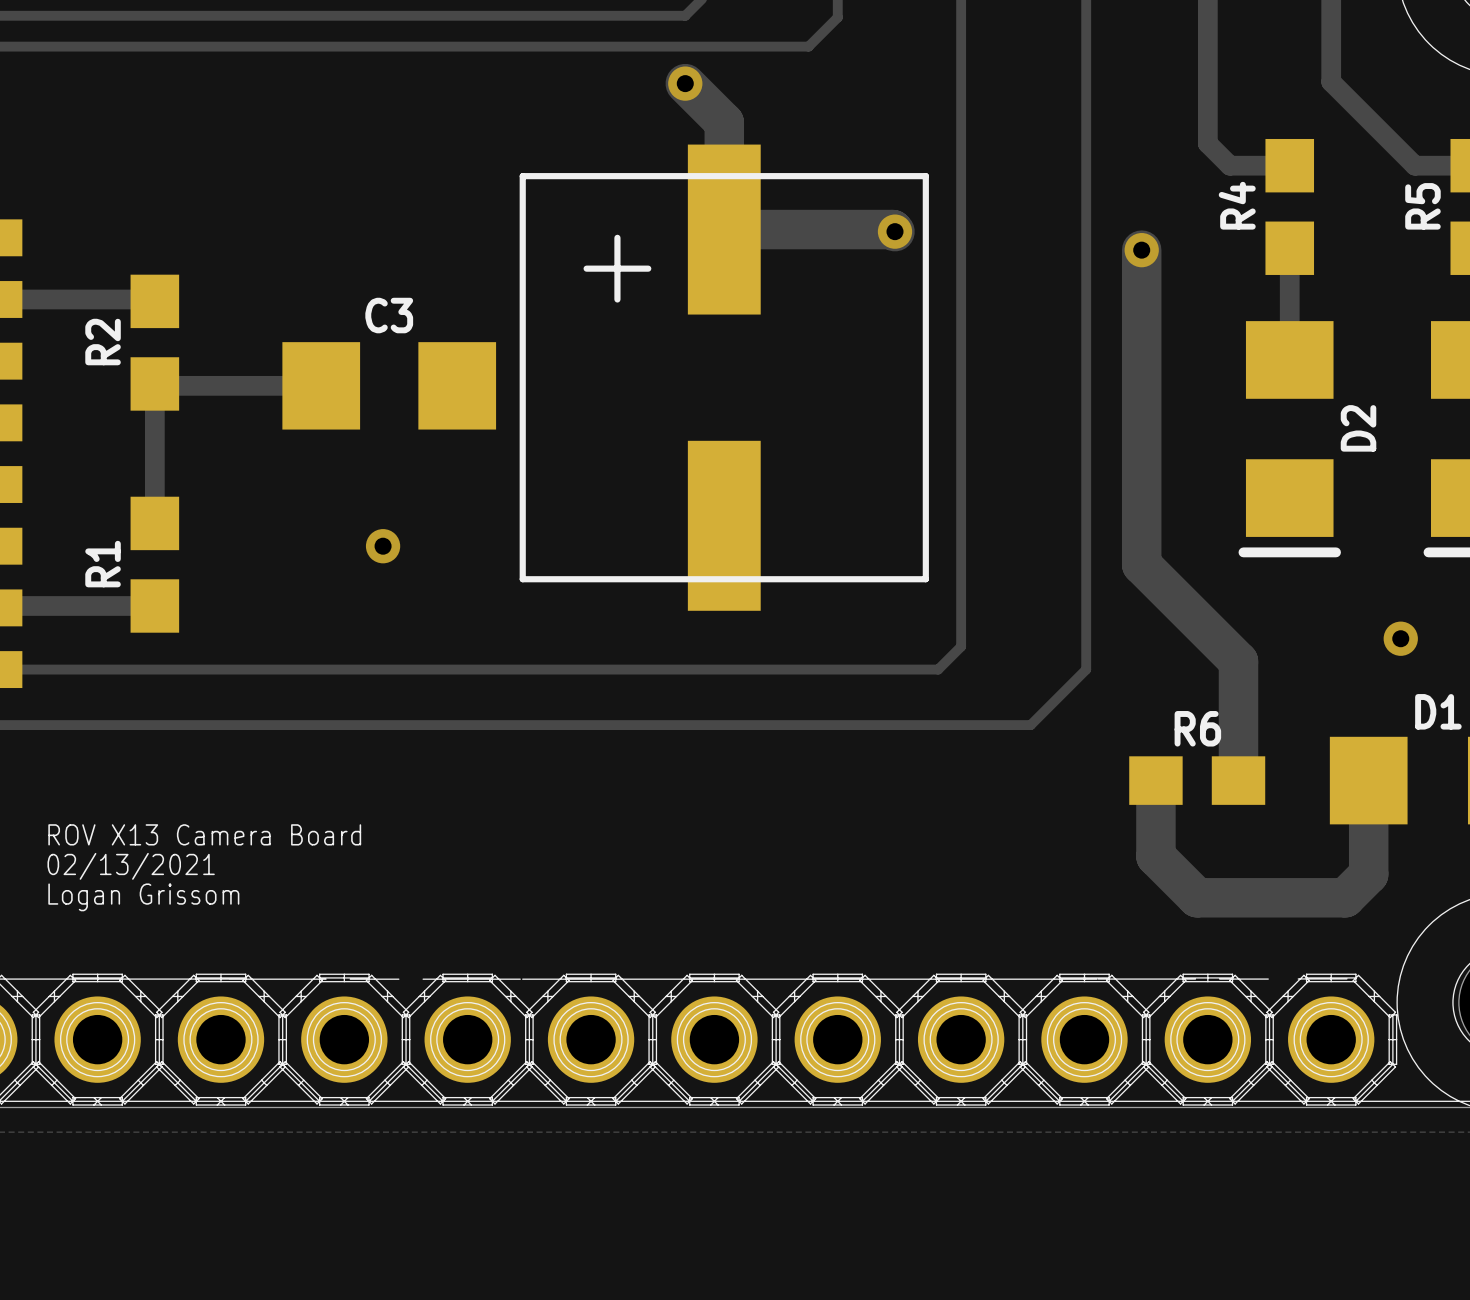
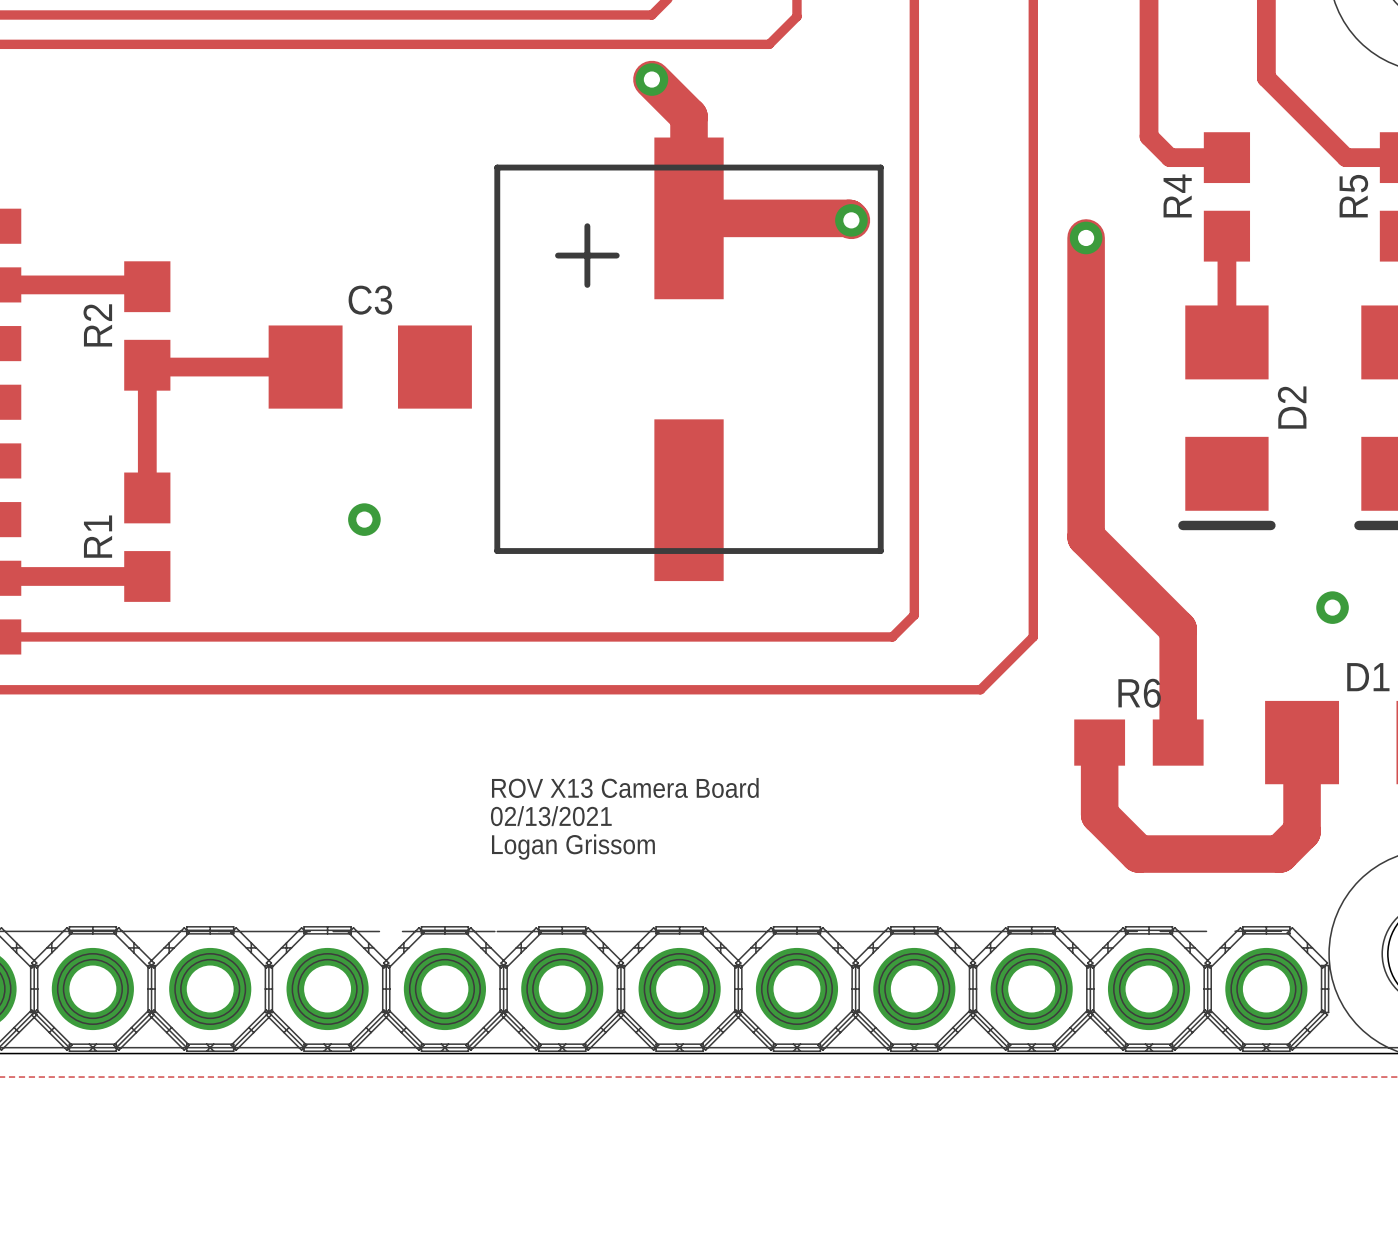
text position: ROV X13 Camera Board (204, 834) -> ROV X13 Camera Board (625, 787)
text position: 02/13/2021 (131, 866) -> 02/13/2021 (551, 816)
text position: Logan Grissom (143, 897) -> Logan Grissom (573, 846)

